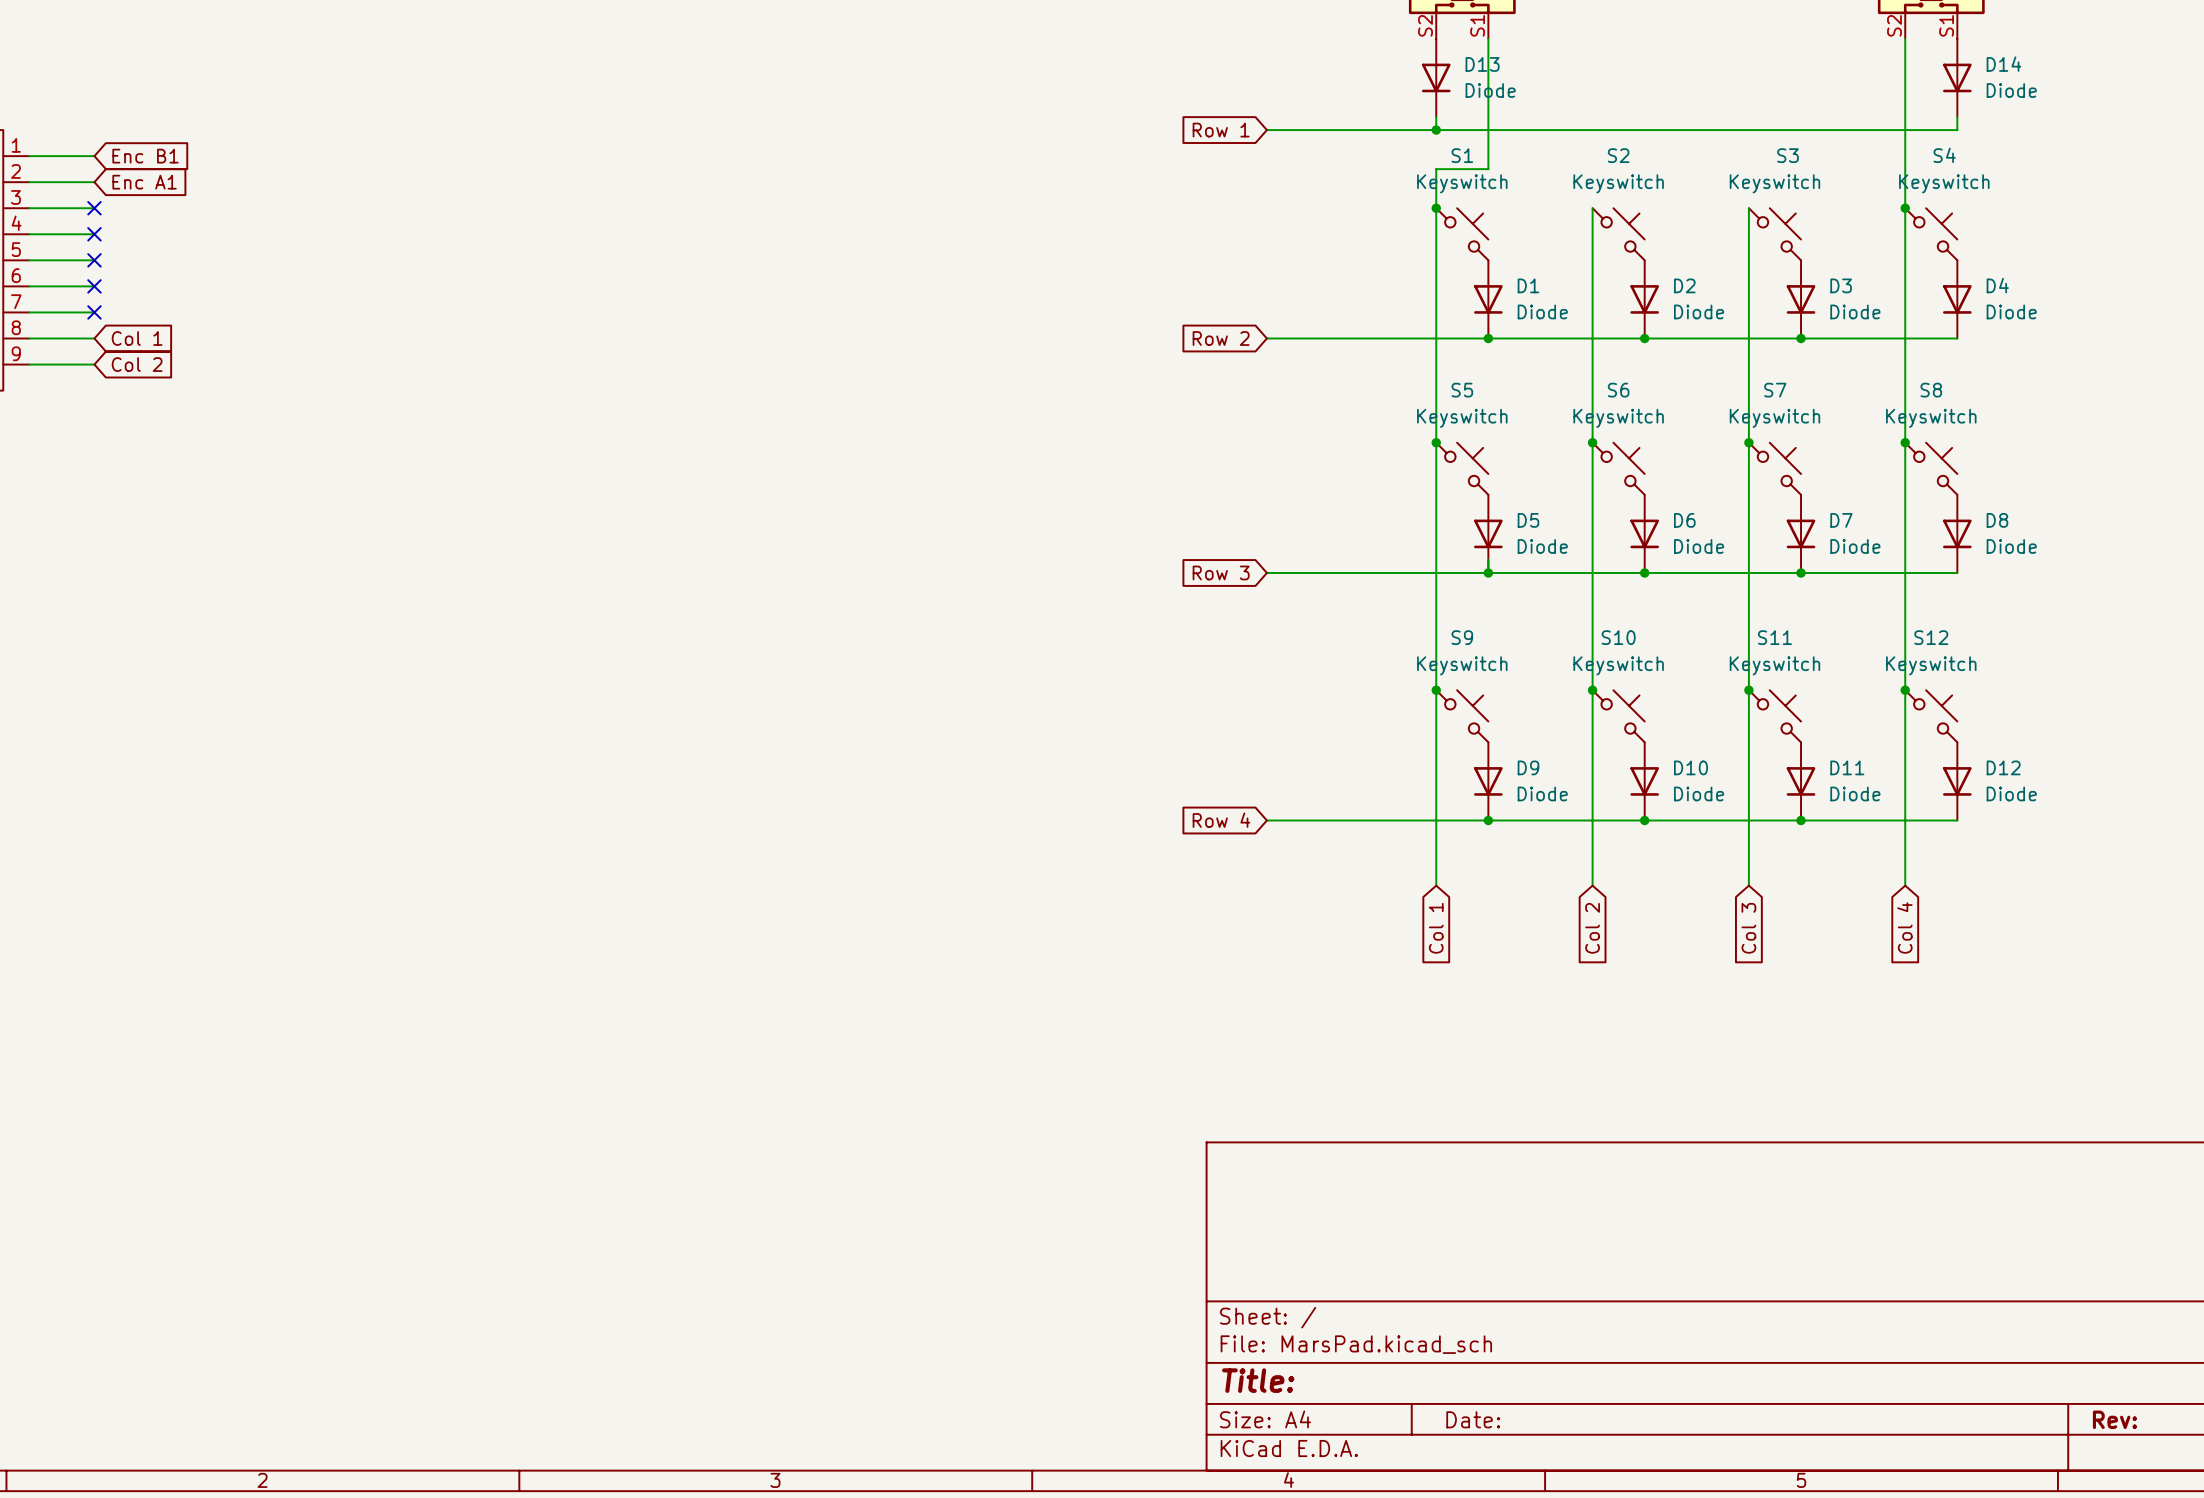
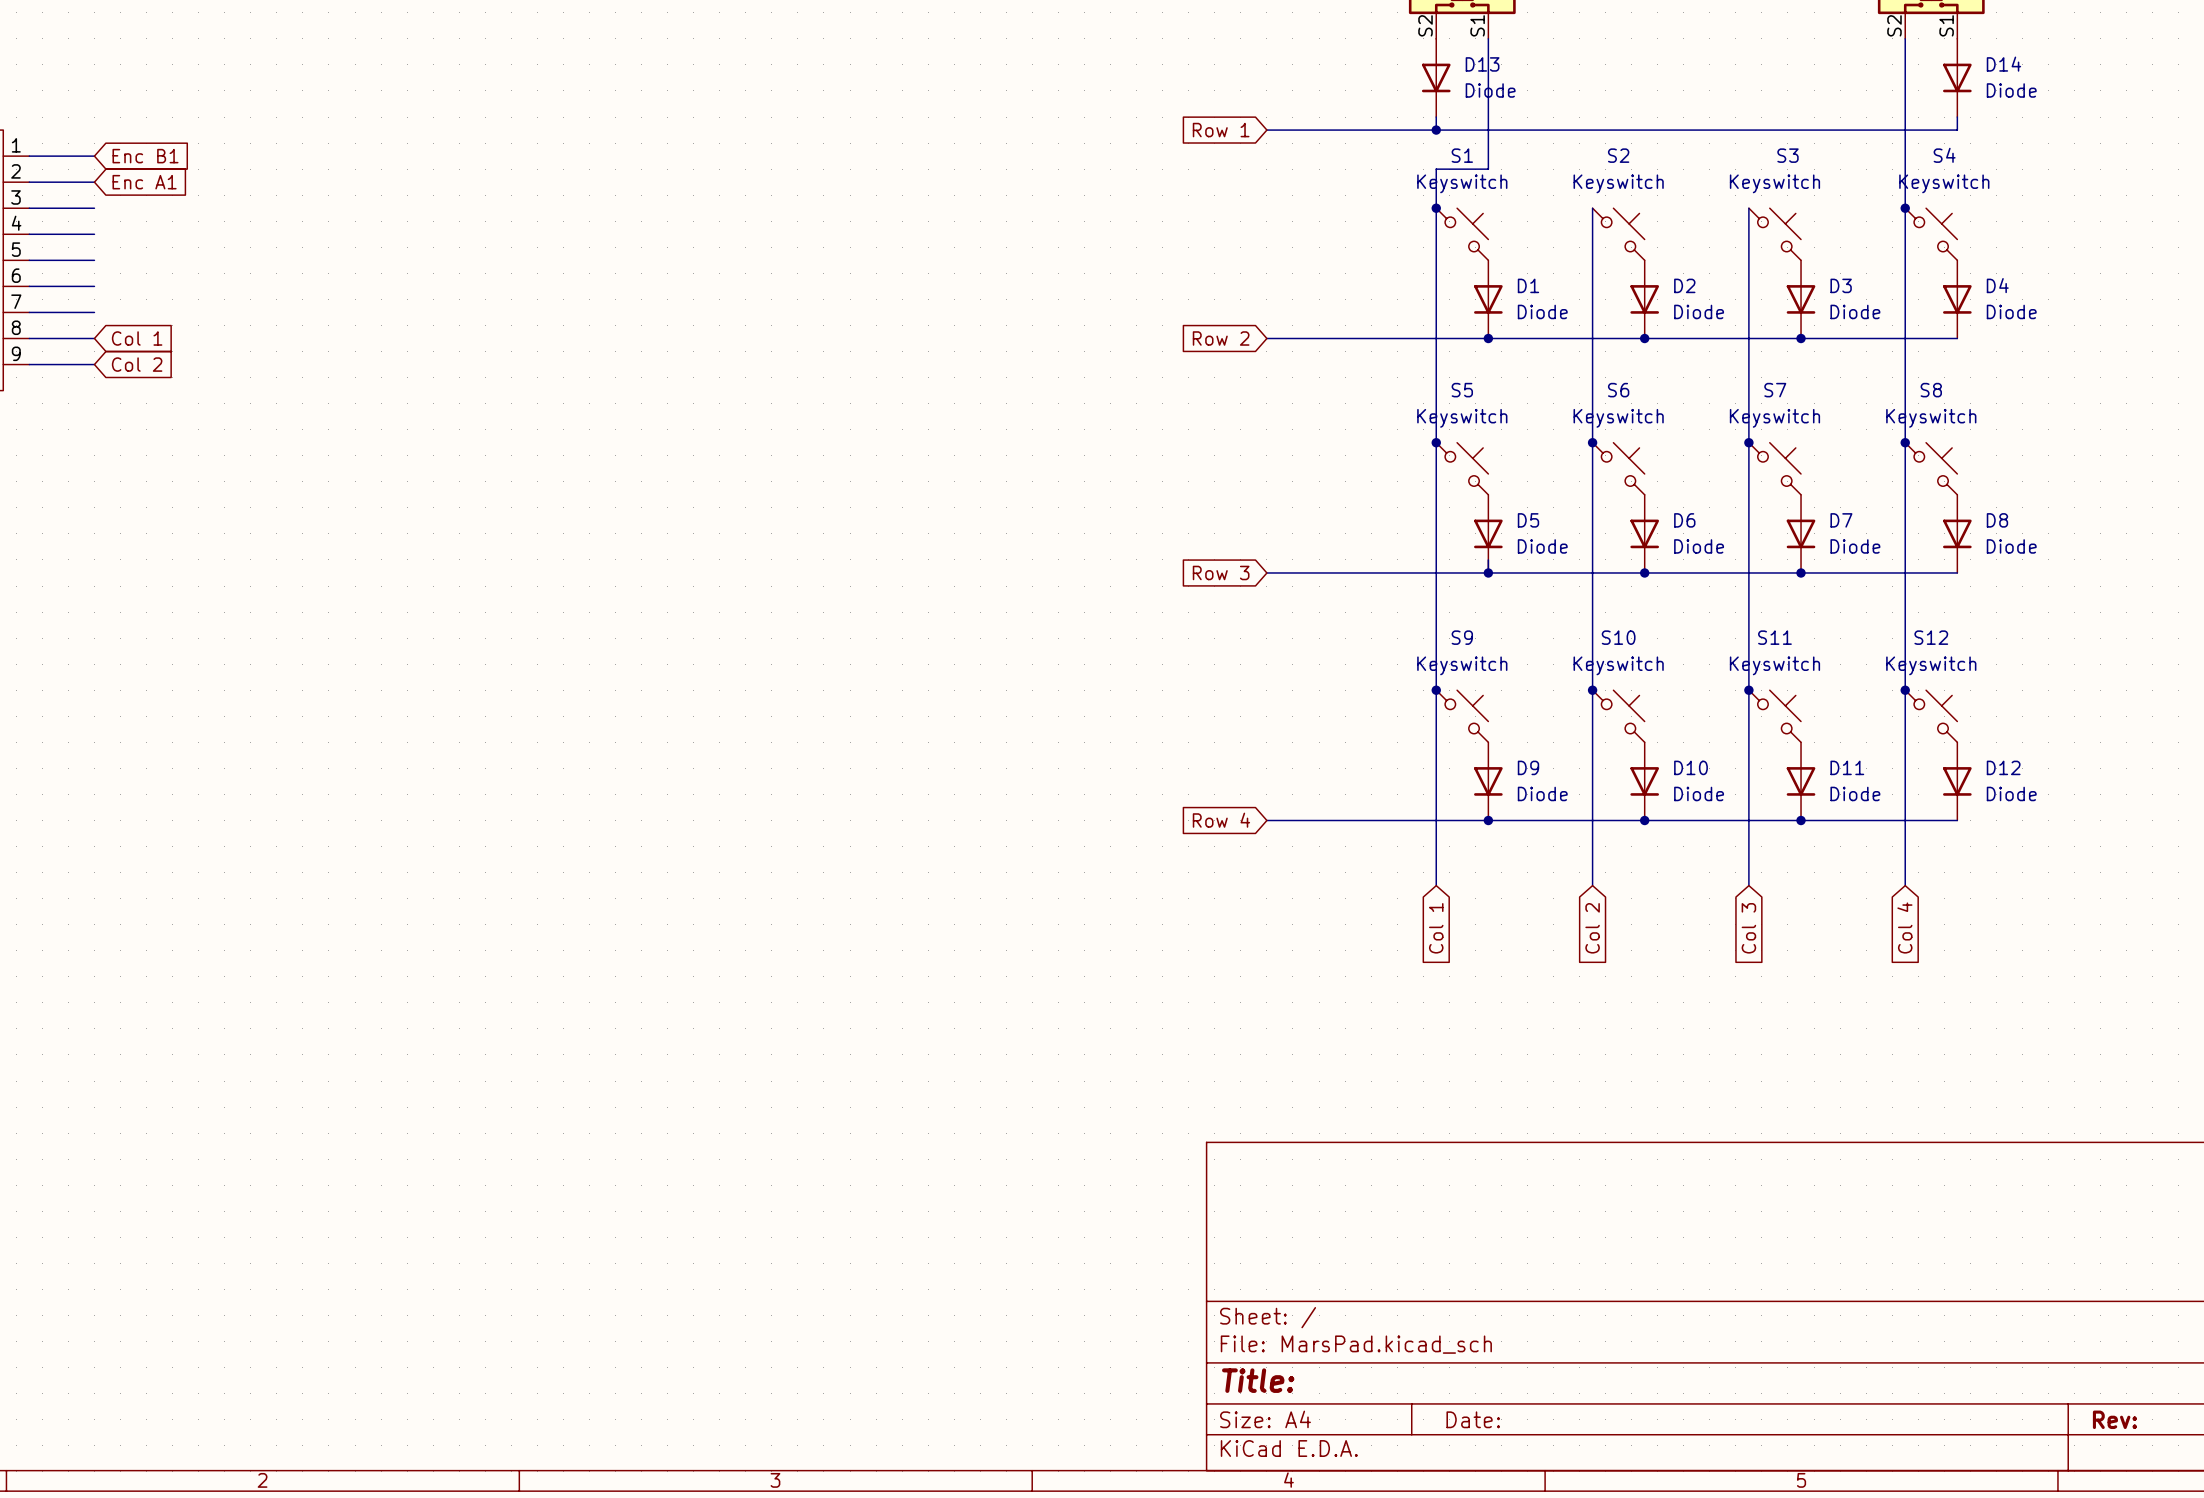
no-connect mark: (94, 208) -> none
no-connect mark: (94, 234) -> none
no-connect mark: (94, 260) -> none
no-connect mark: (94, 286) -> none
no-connect mark: (94, 312) -> none

